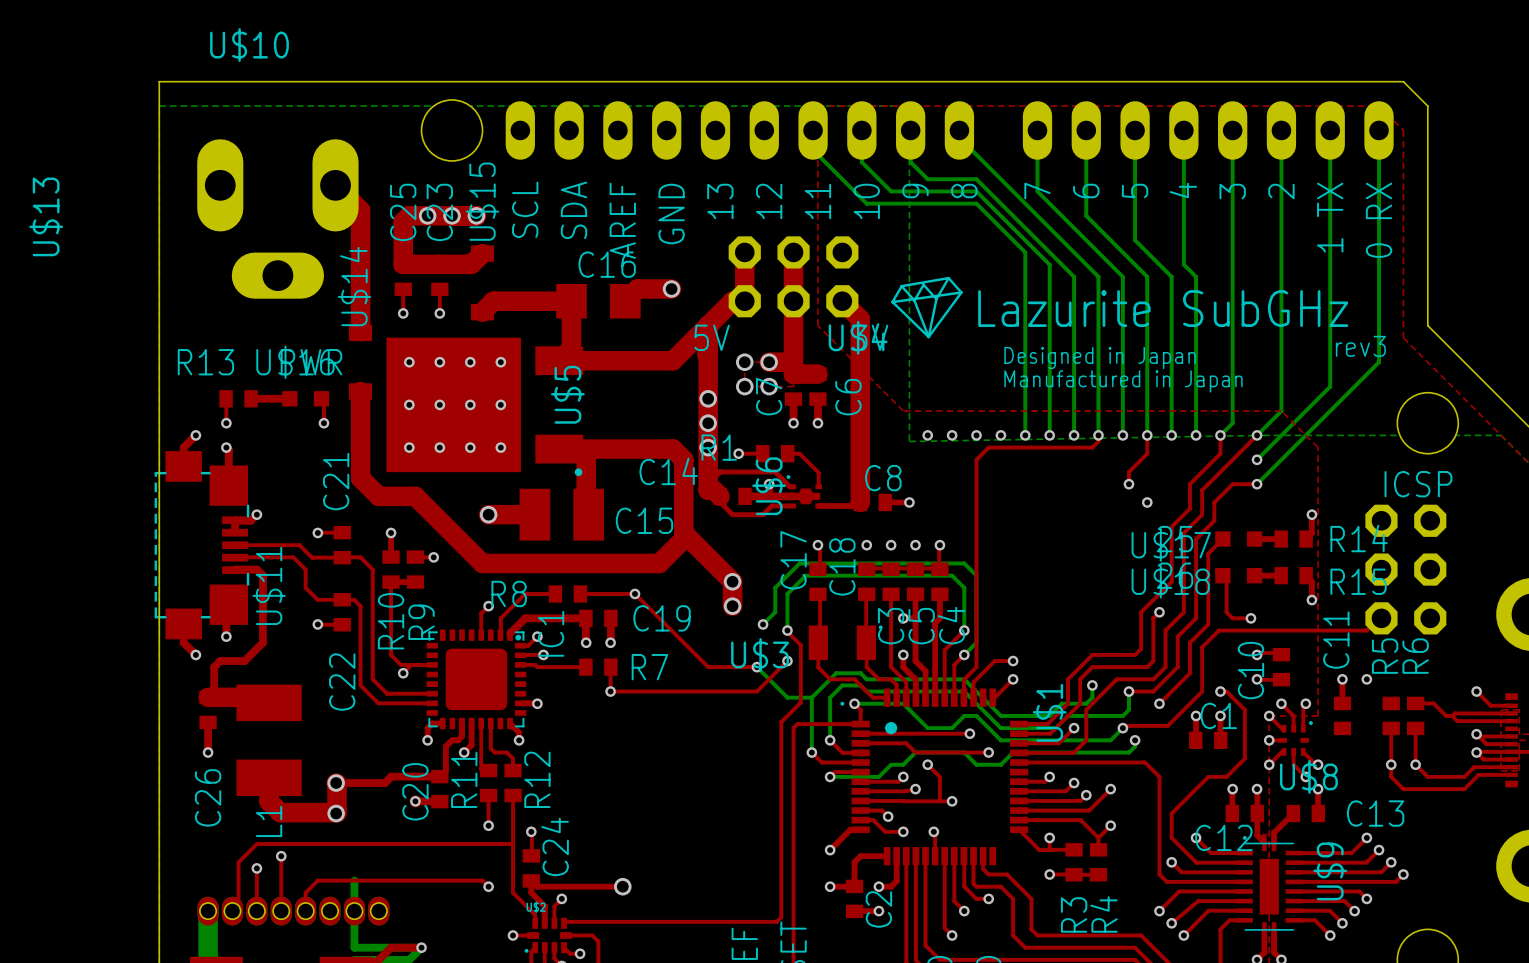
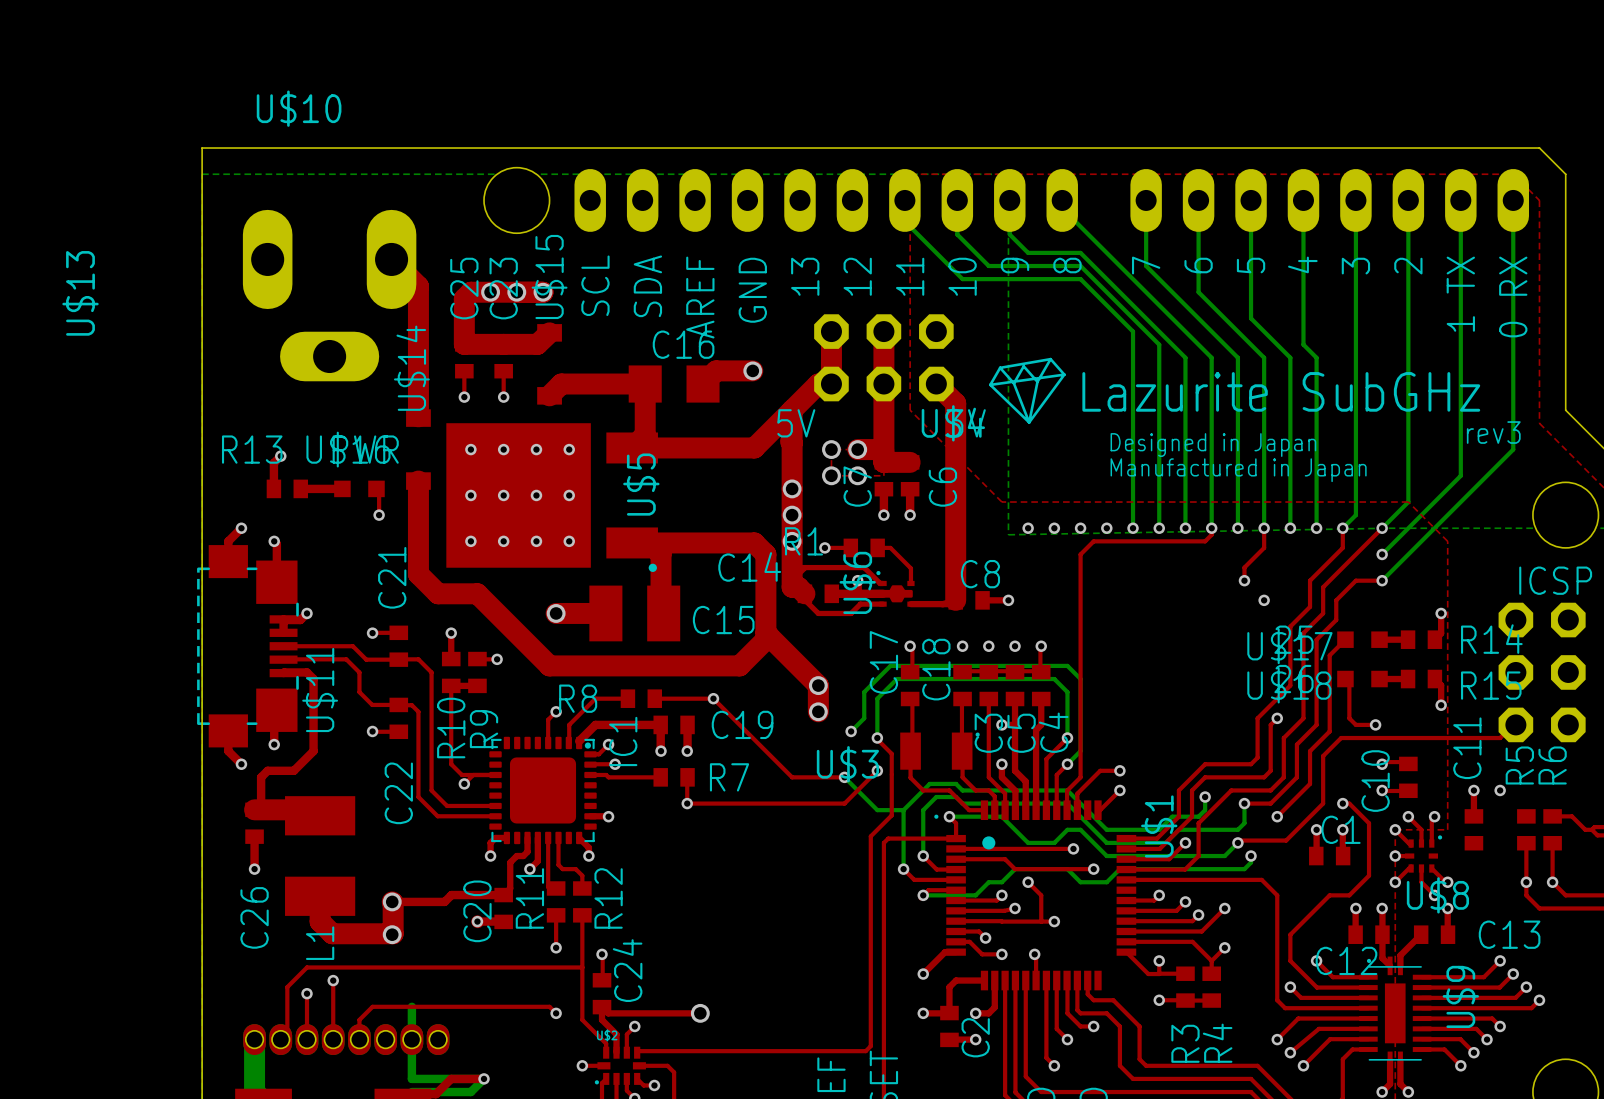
top track: (226, 398) (226, 423) -> (273, 488) (273, 462) (280, 456)
via position: (226, 423) -> (280, 456)

